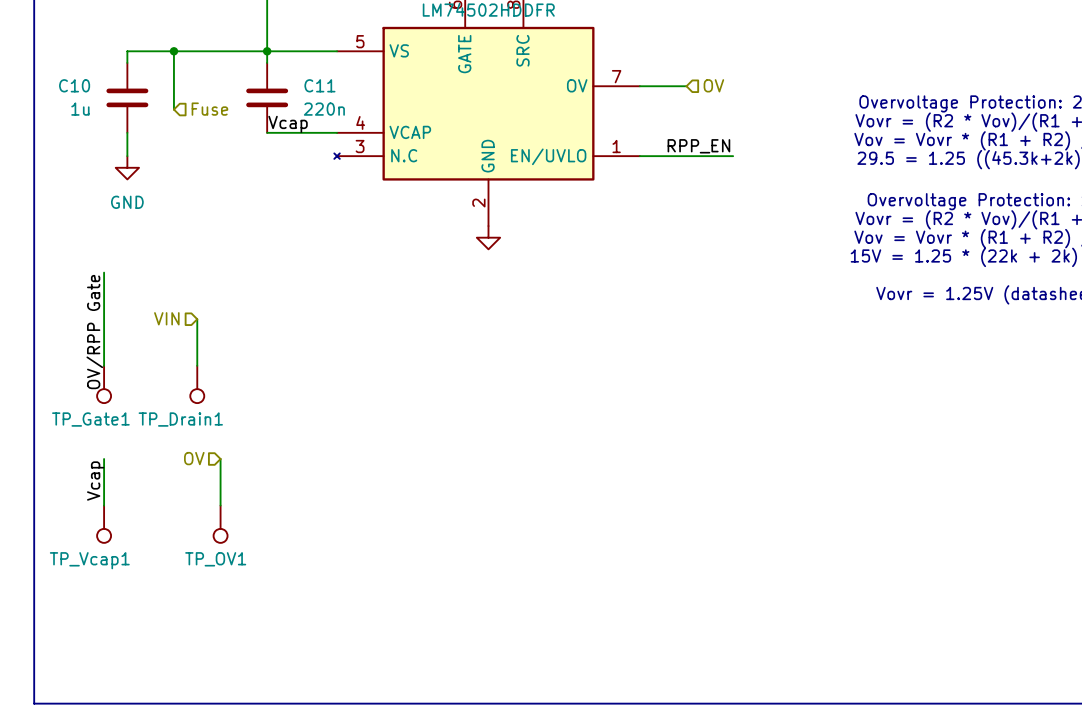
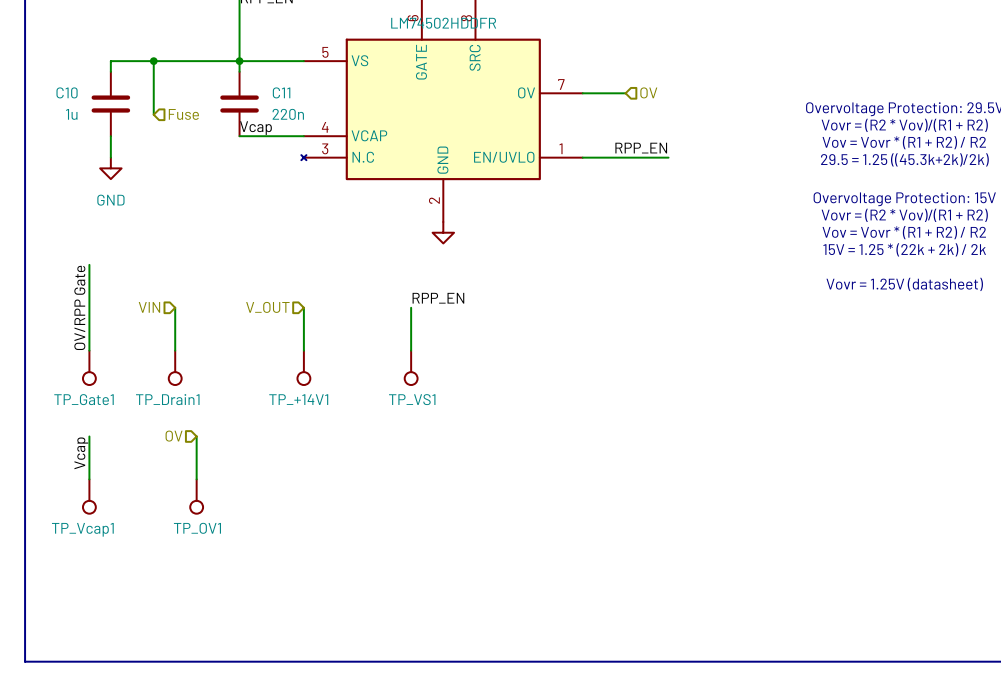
label: none -> RPP_EN (438, 298)
hierarchical label: none -> V_OUT (267, 307)
wire: none -> (303, 307) (303, 350)
wire: none -> (411, 307) (411, 350)
TP_+14V1: none -> (303, 367)
TP_VS1: none -> (411, 367)

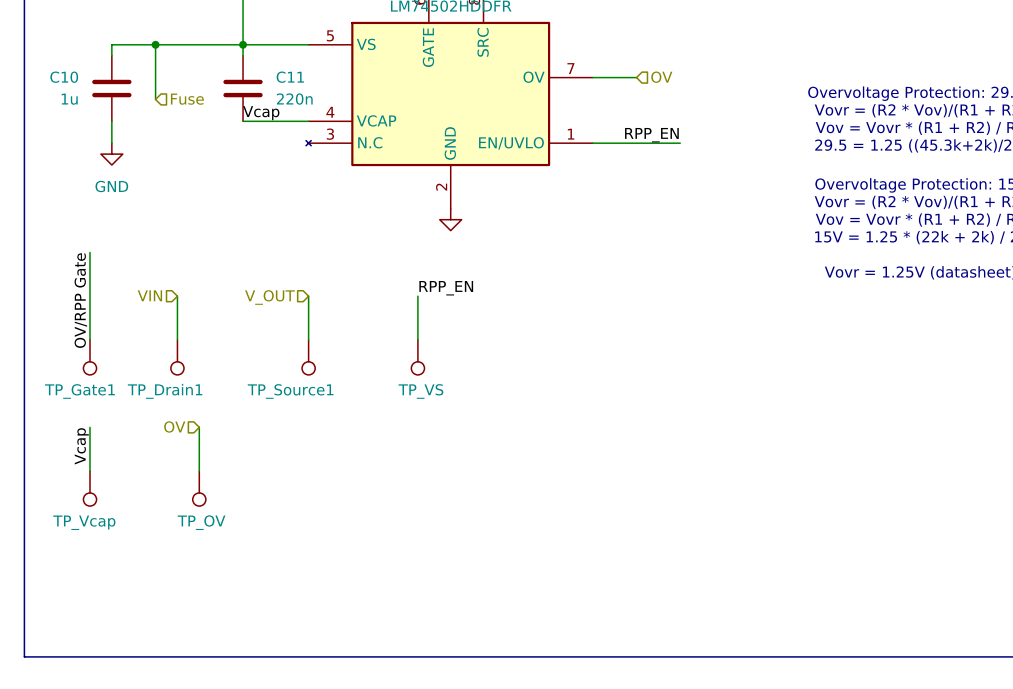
TP_+14V1 name: TP_+14V1 (298, 399) -> TP_Source1 (290, 391)
TP_VS1 name: TP_VS1 (412, 399) -> TP_VS (420, 391)
TP_OV1 name: TP_OV1 (197, 528) -> TP_OV (201, 522)
TP_Vcap1 name: TP_Vcap1 (82, 529) -> TP_Vcap (84, 522)

